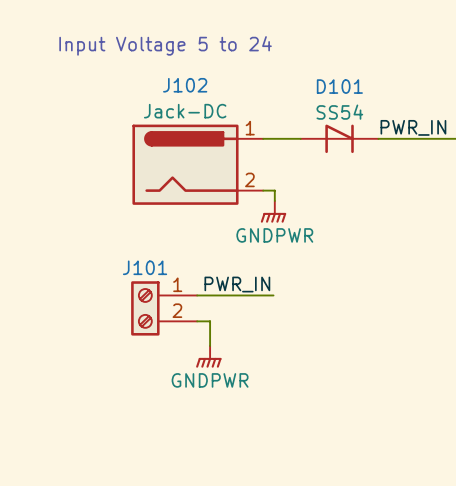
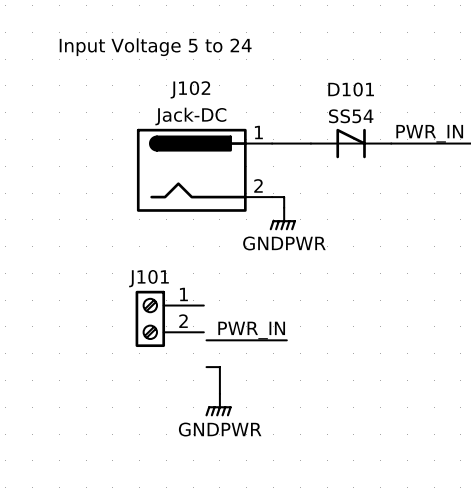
label position: PWR_IN (237, 284) -> PWR_IN (251, 330)
wire: (197, 295) (273, 295) -> none
wire: (197, 321) (210, 321) (210, 345) -> none
wire: none -> (206, 340) (286, 340)
wire: none -> (206, 367) (219, 367) (219, 393)
power symbol position: GNDPWR (208, 356) -> GNDPWR (218, 405)

